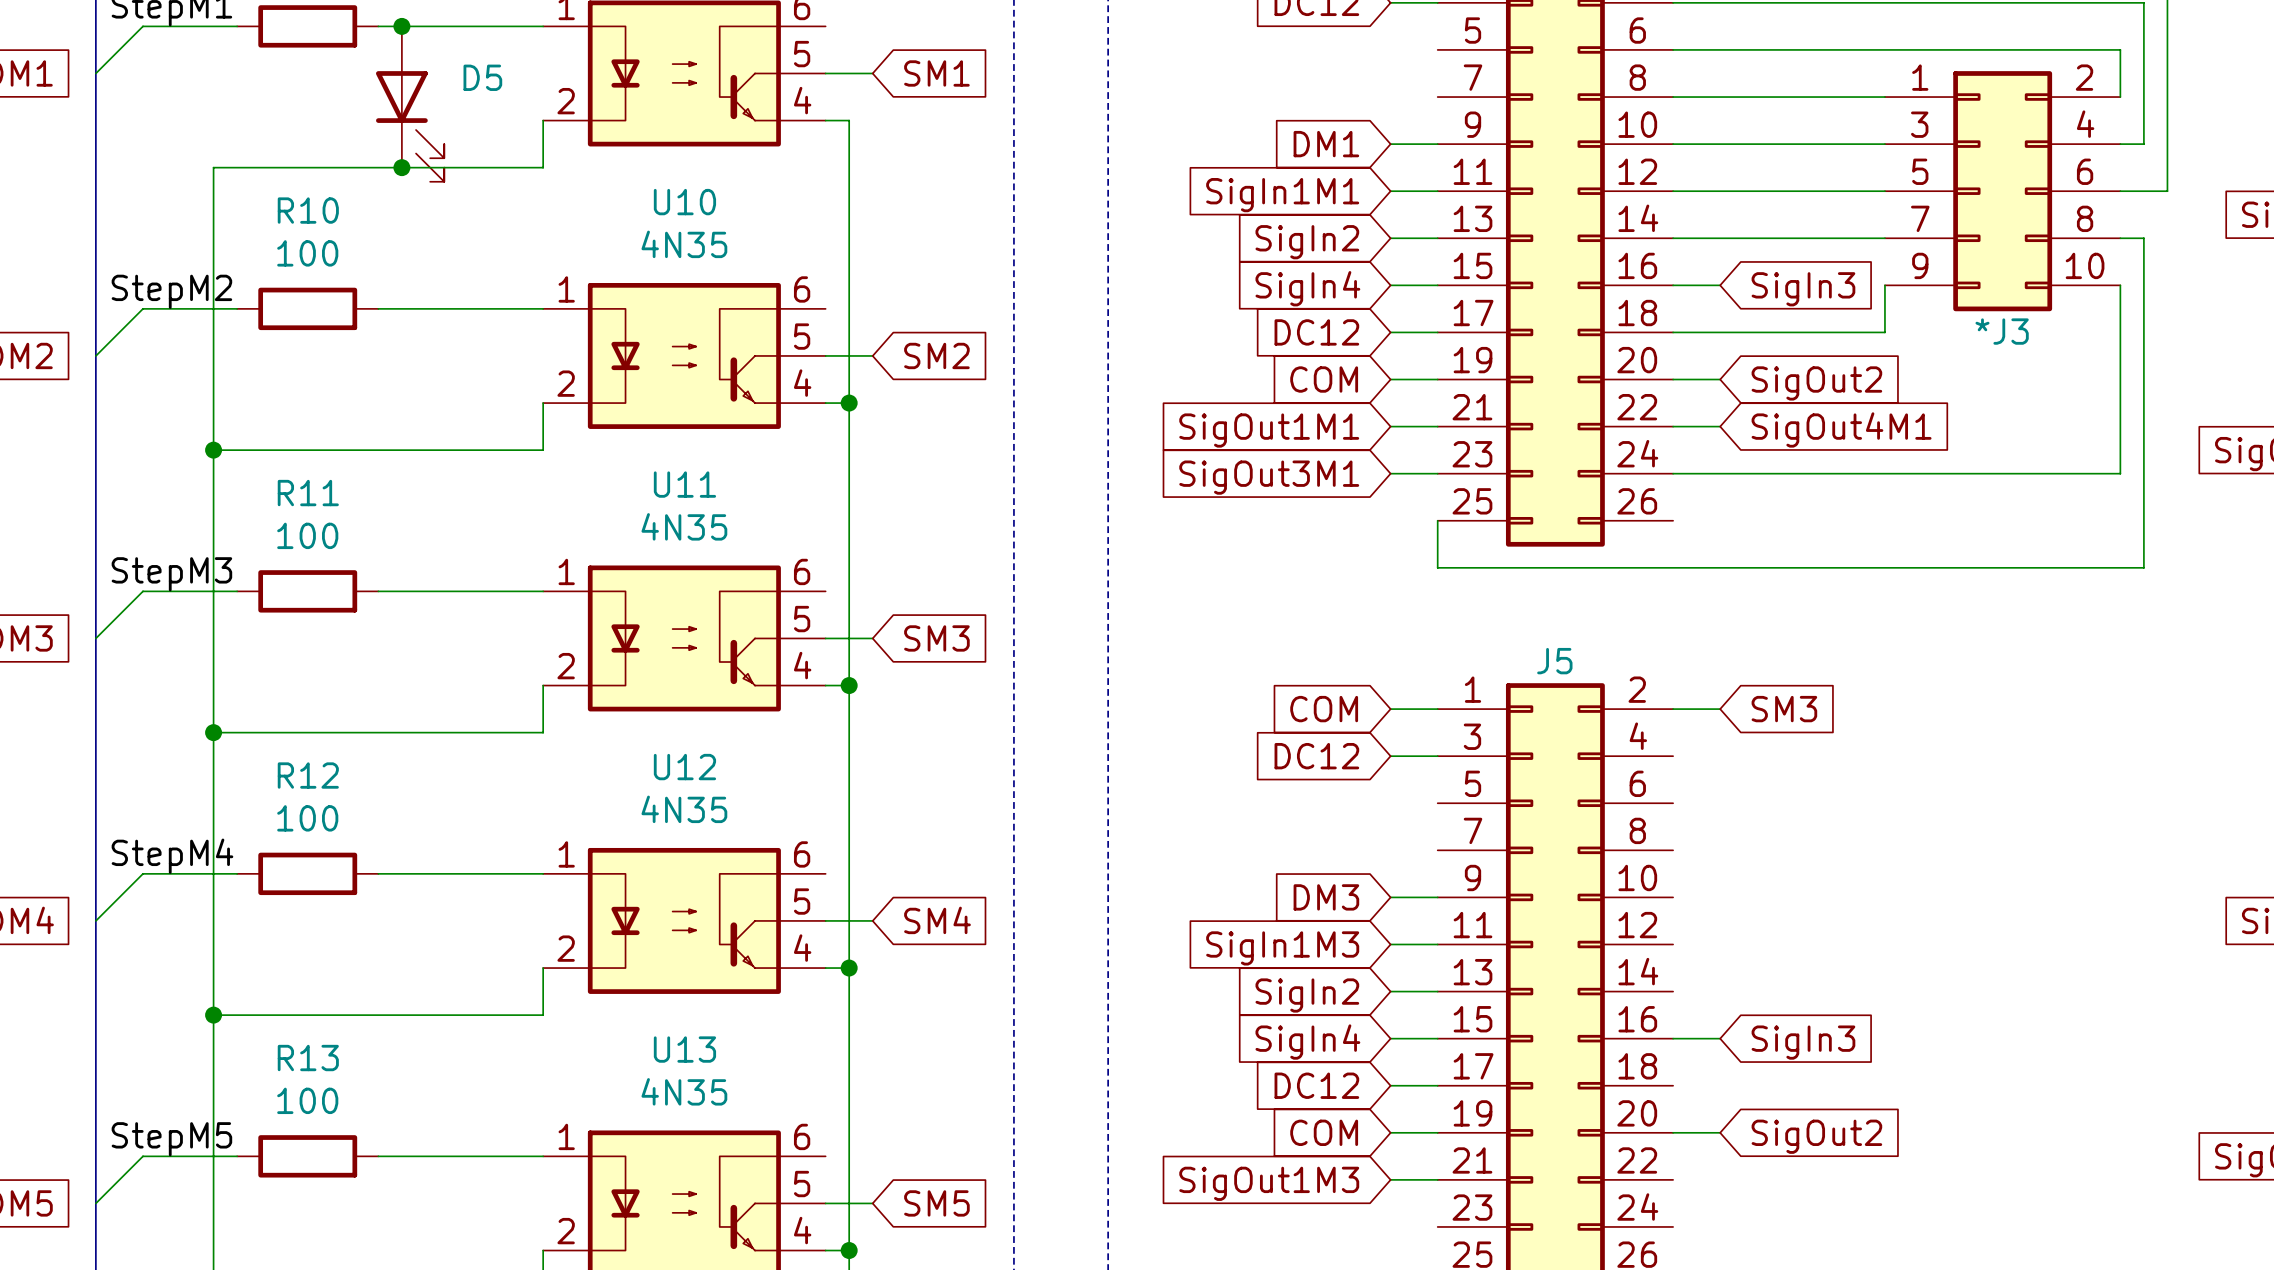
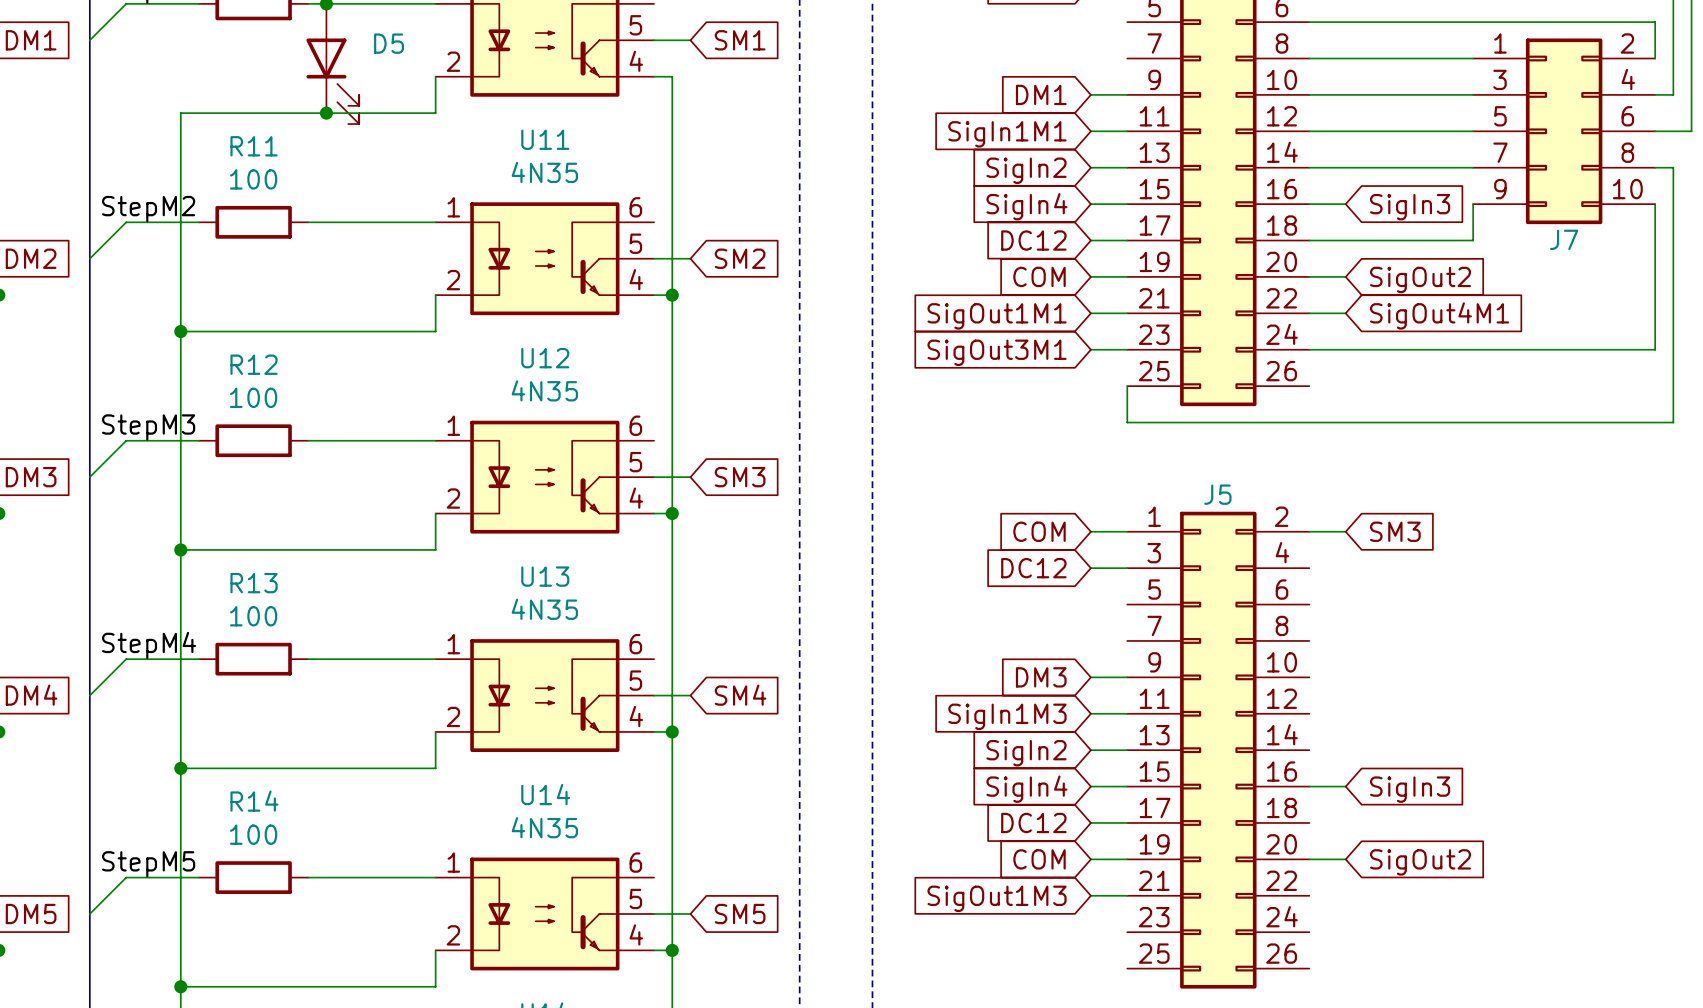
U10 name: U10 (684, 202) -> U11 (545, 139)
R10 name: R10 (308, 210) -> R11 (254, 146)
*J3 name: *J3 (2002, 331) -> J7 (1564, 239)
U11 name: U11 (684, 484) -> U12 (545, 358)
R11 name: R11 (308, 493) -> R12 (254, 364)
U12 name: U12 (684, 767) -> U13 (545, 576)
R12 name: R12 (308, 775) -> R13 (254, 583)
U13 name: U13 (684, 1049) -> U14 (545, 794)
R13 name: R13 (308, 1058) -> R14 (254, 801)

